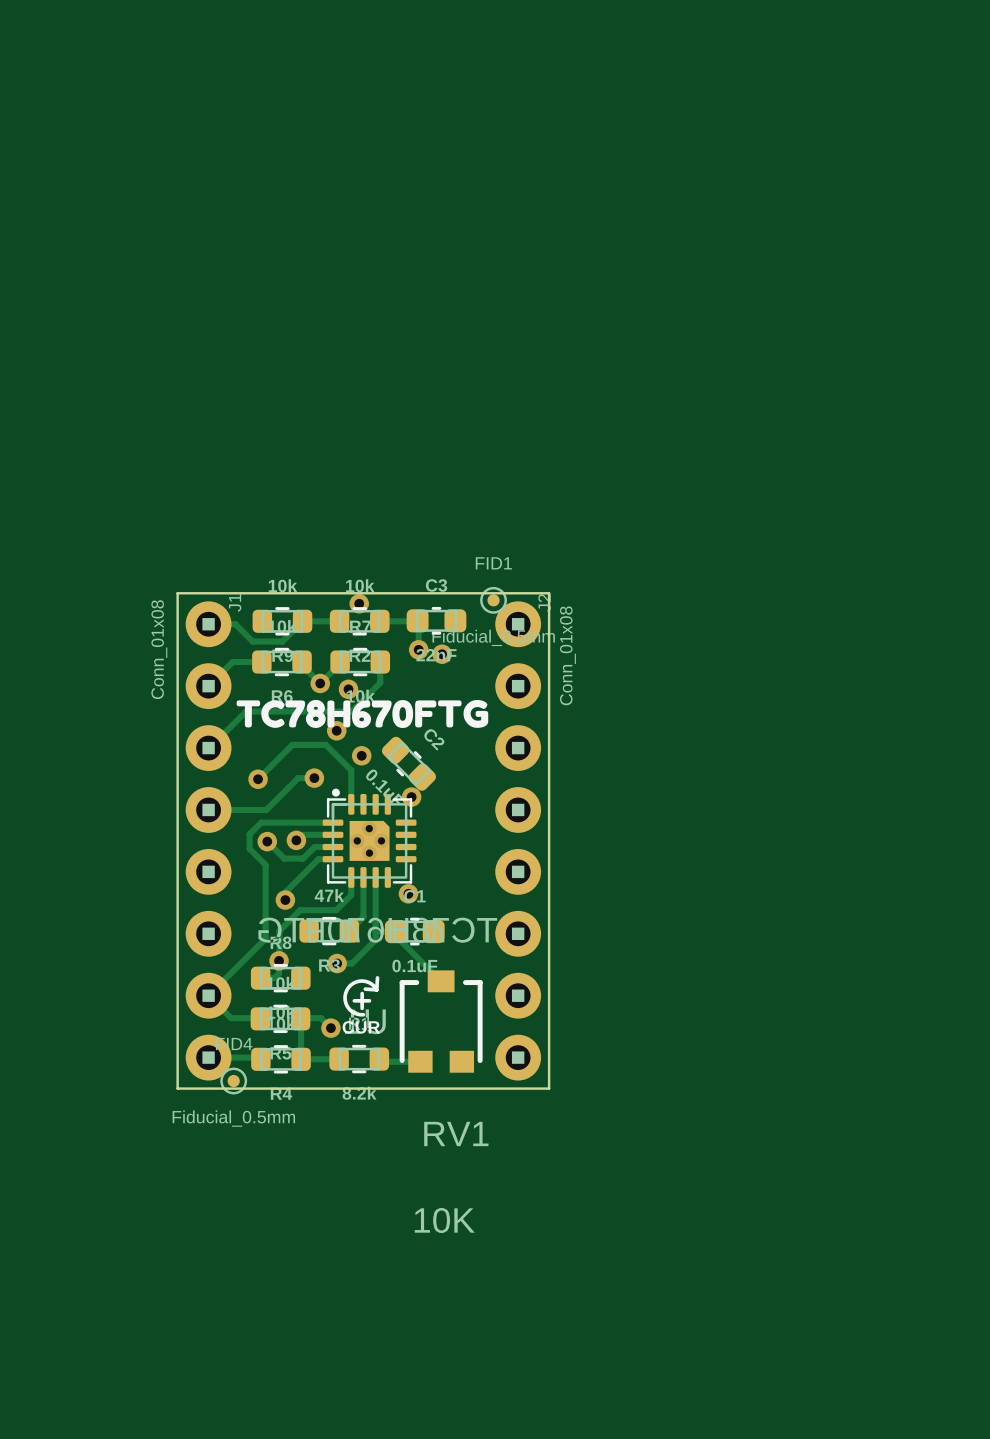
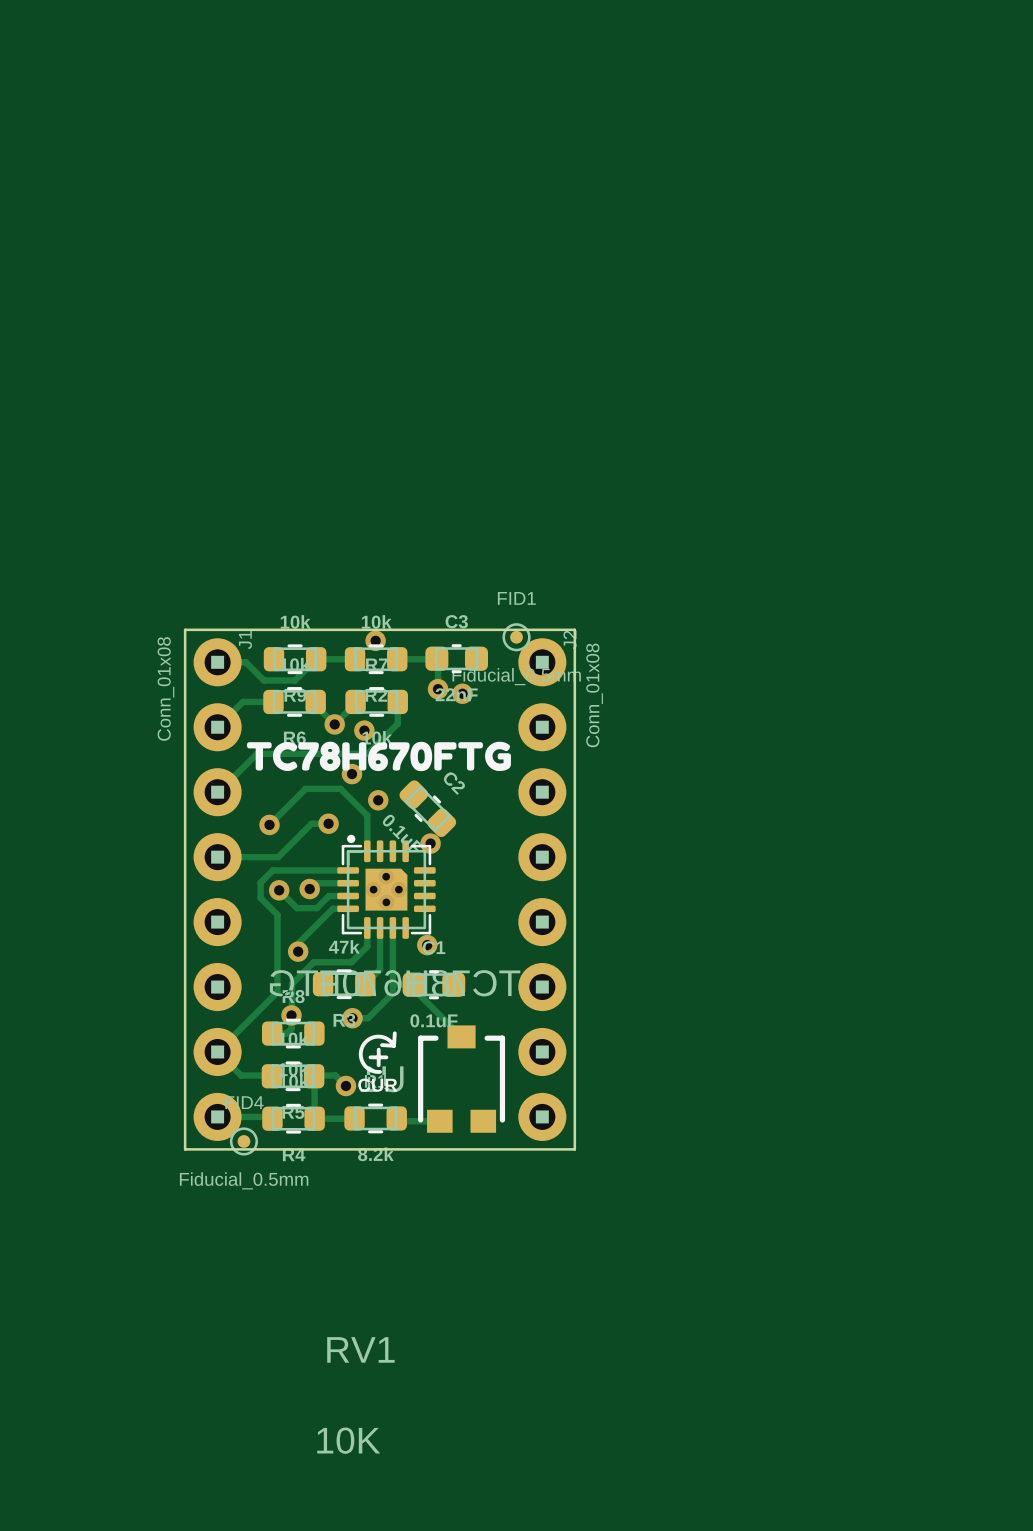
RV1 name position: RV1 (456, 1133) -> RV1 (360, 1349)
RV1 value position: 10K (444, 1220) -> 10K (348, 1440)

